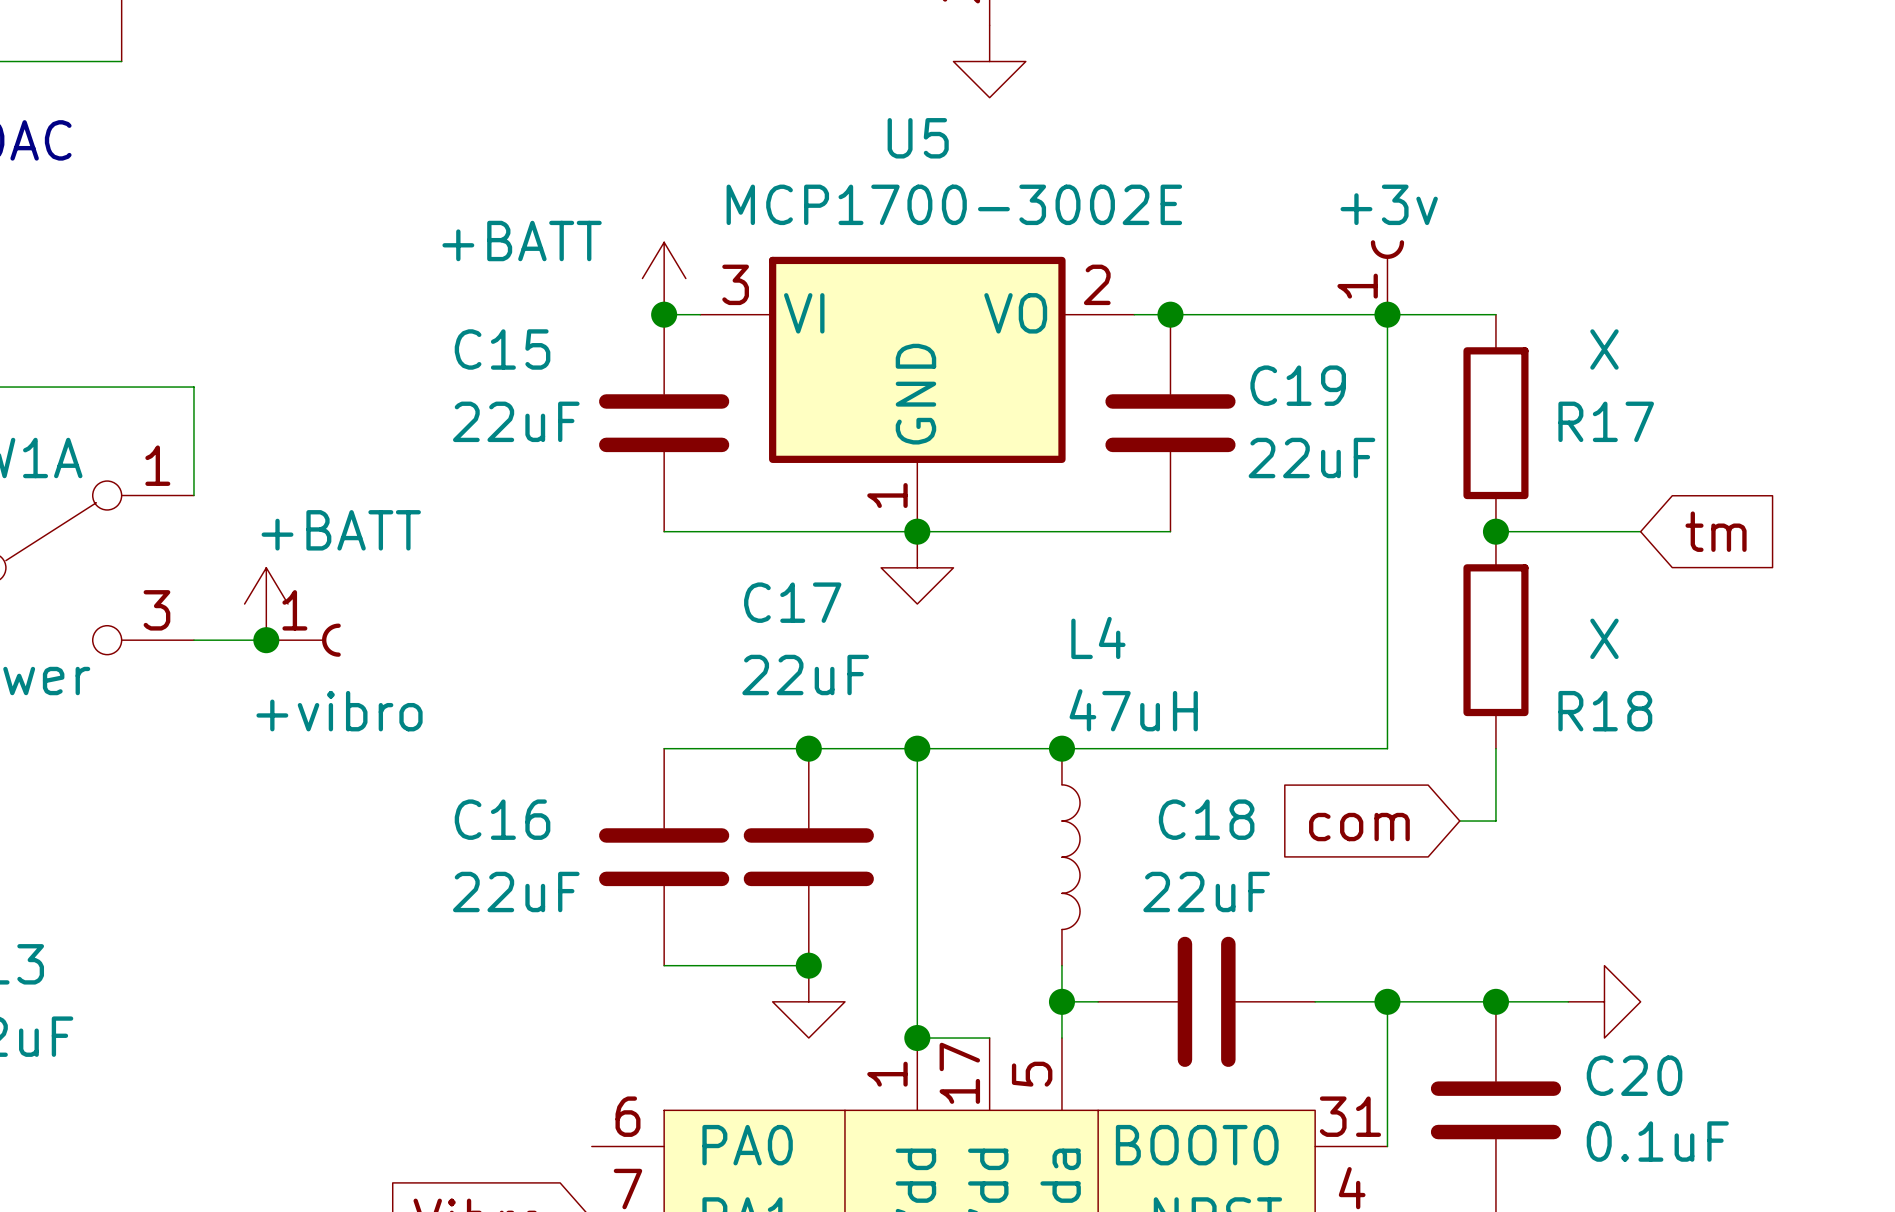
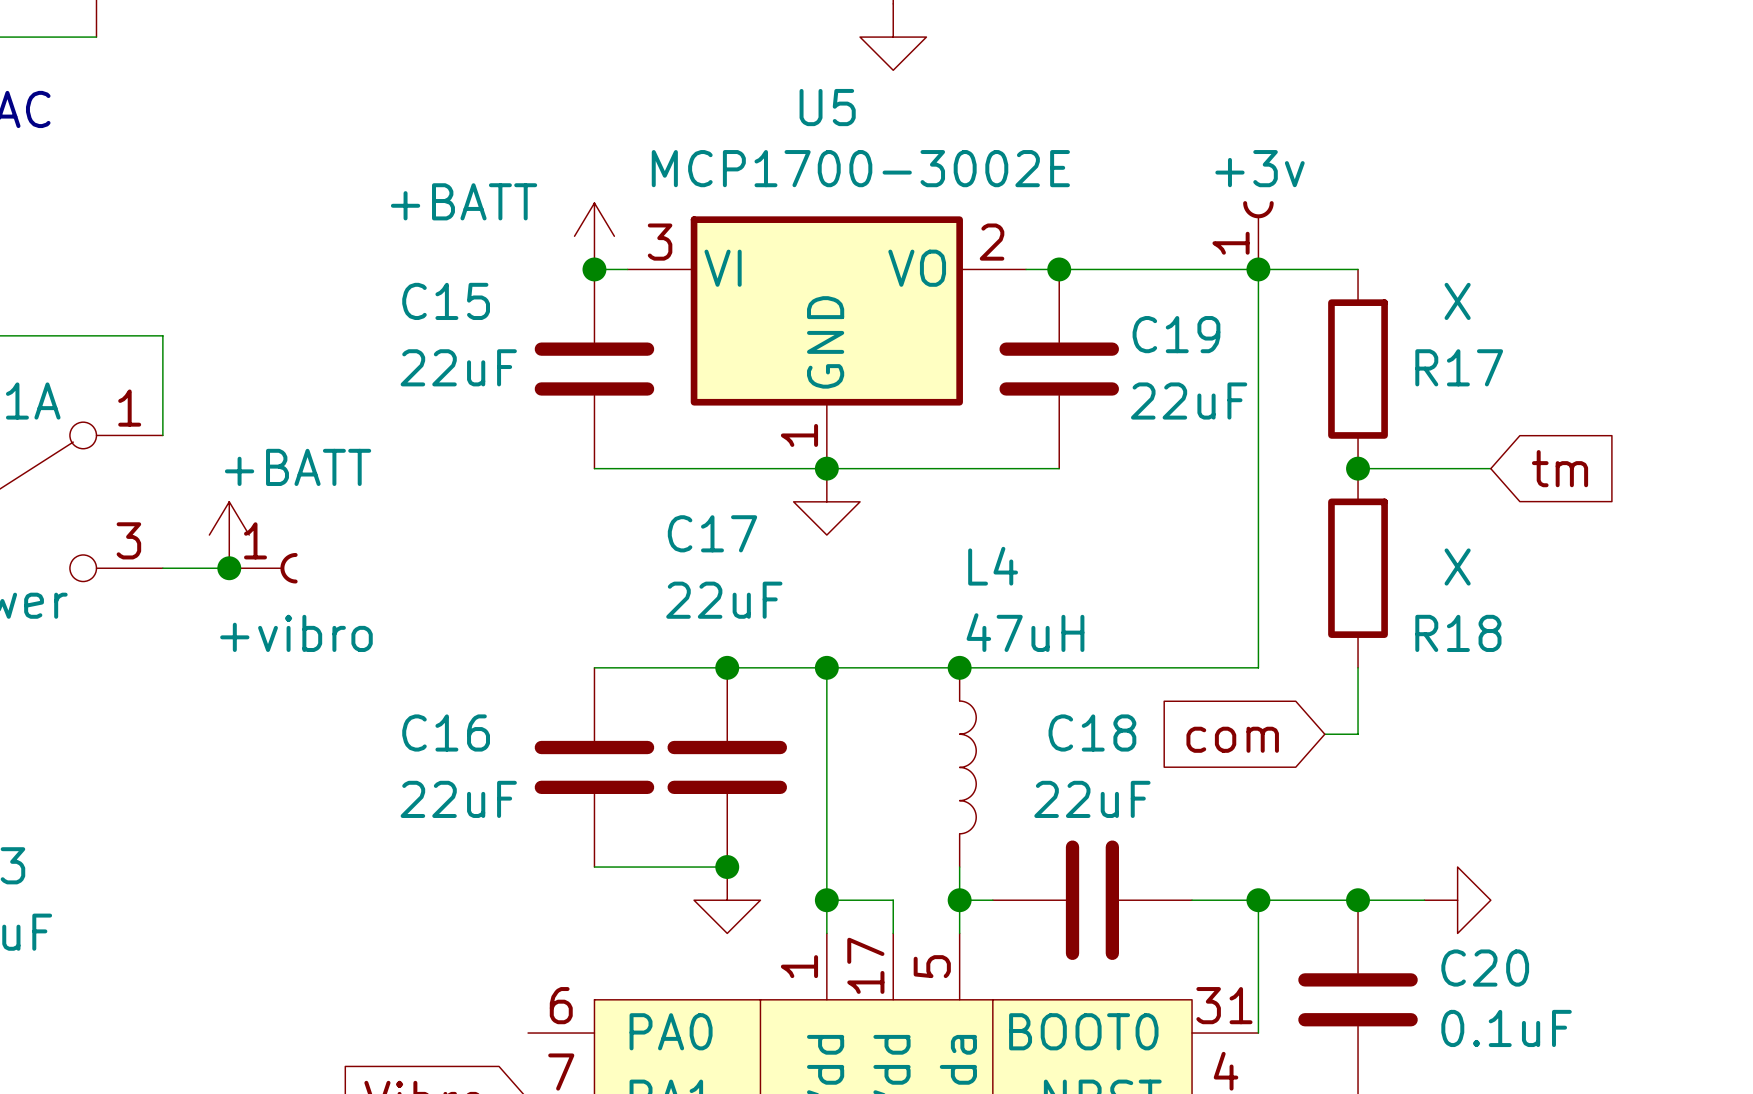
wire: (917, 1038) (989, 1038) -> (826, 900) (893, 900) (893, 933)
junction position: (917, 1038) -> (826, 900)

